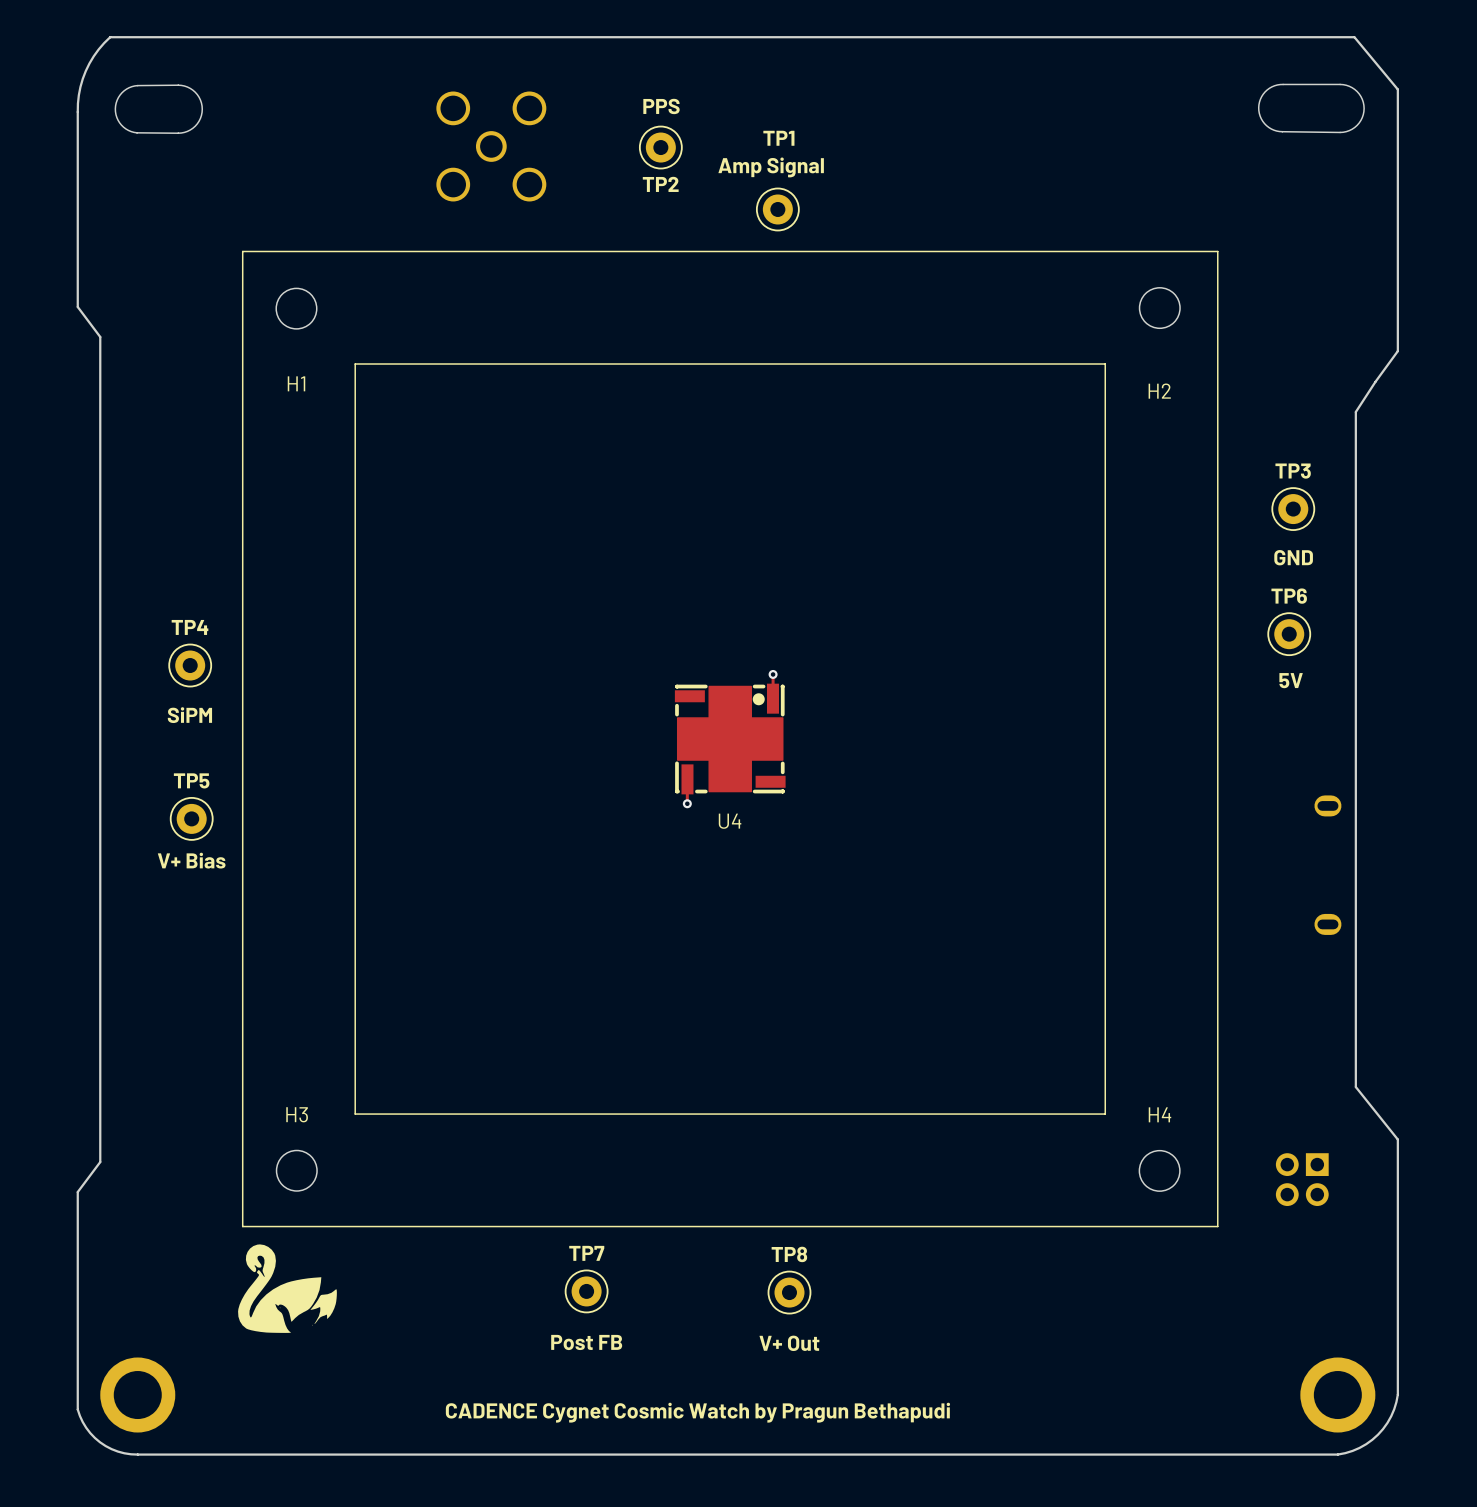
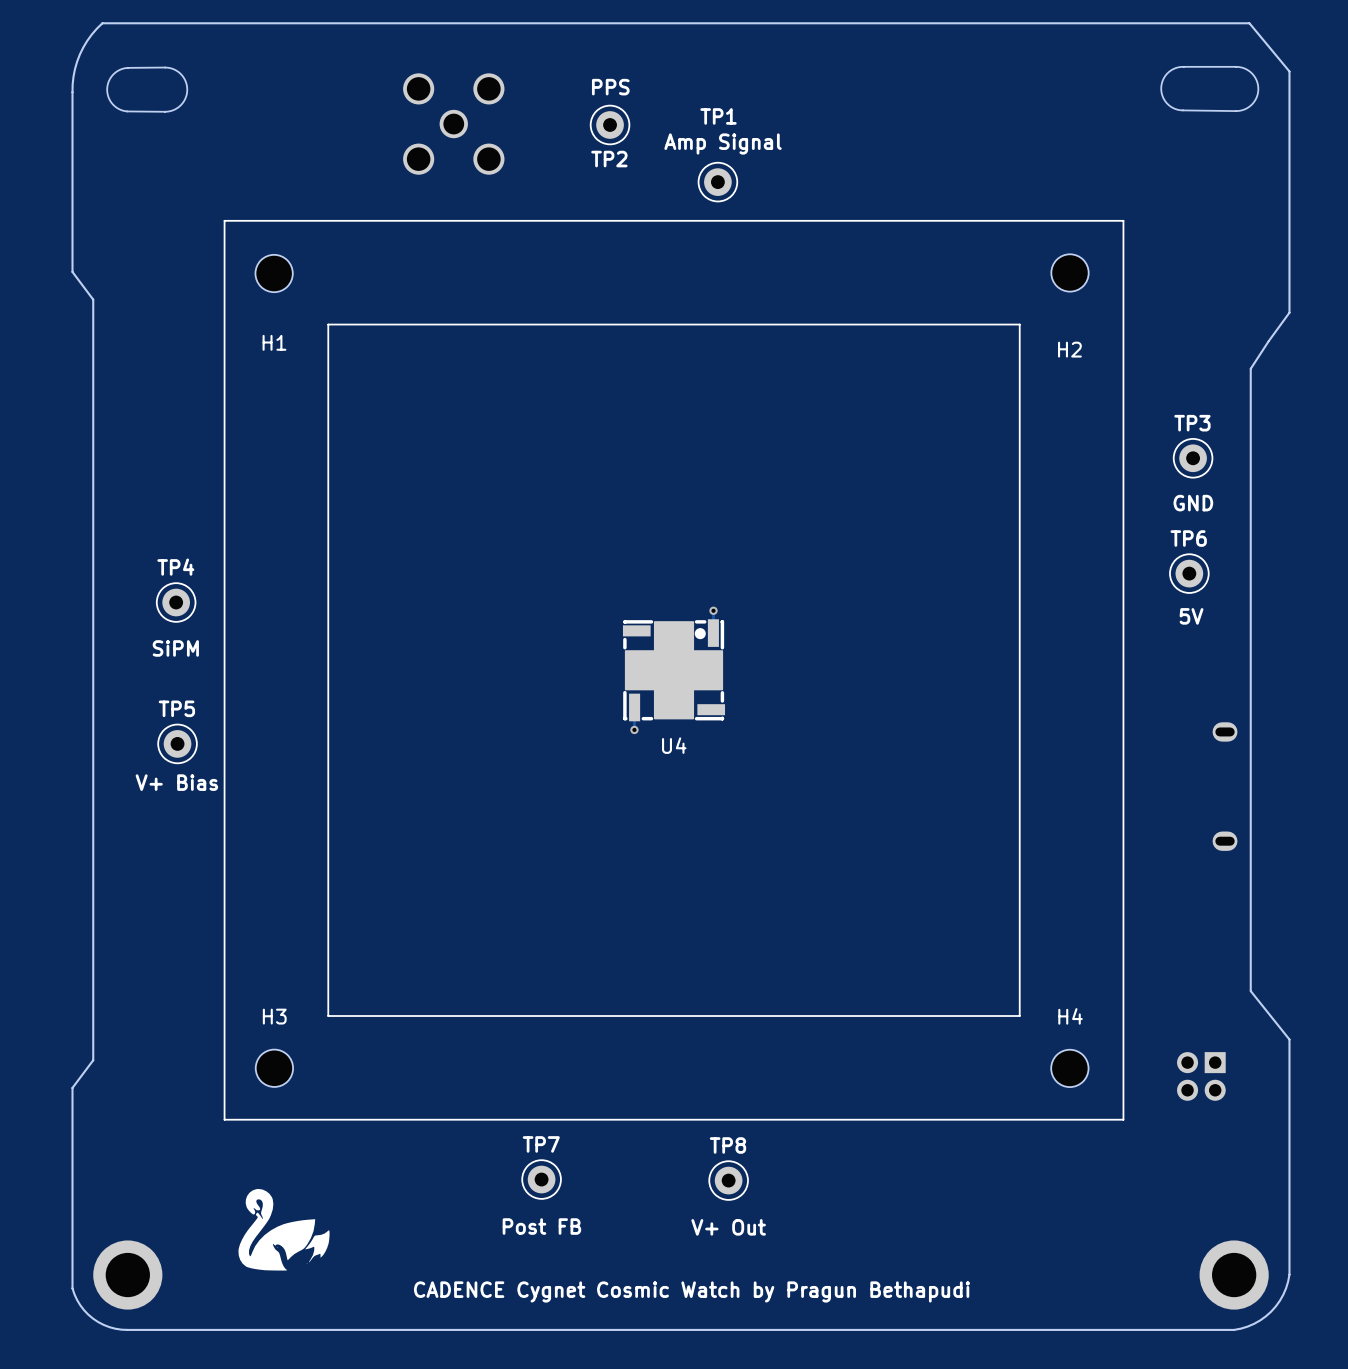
drawing position: (287, 1288) -> (284, 1229)

